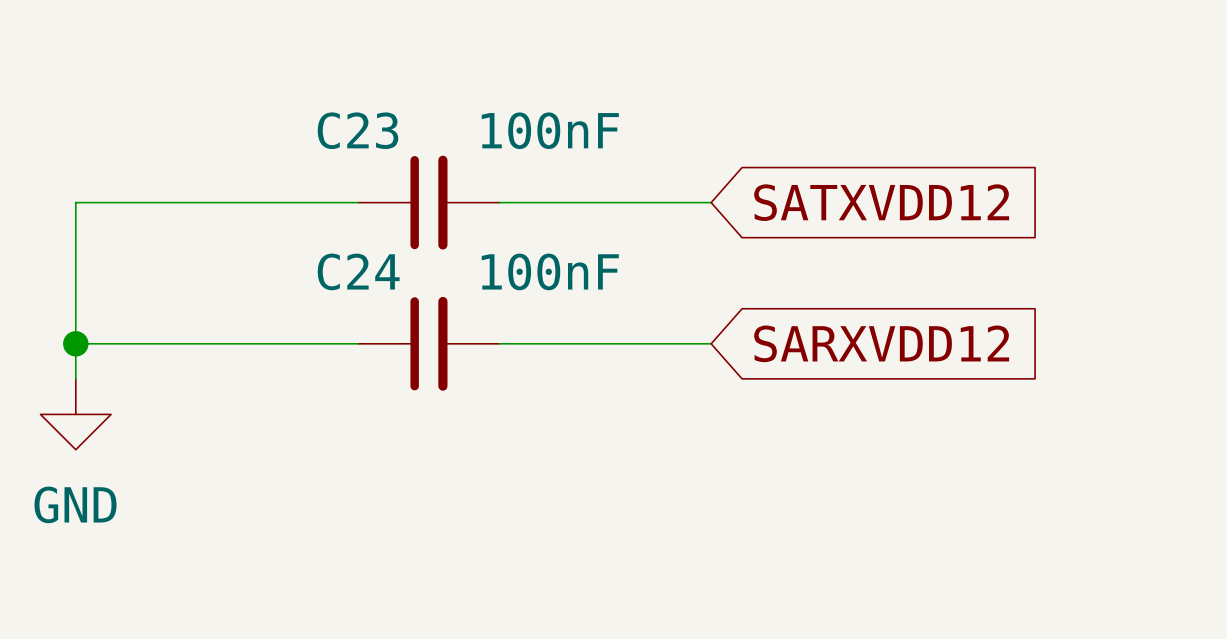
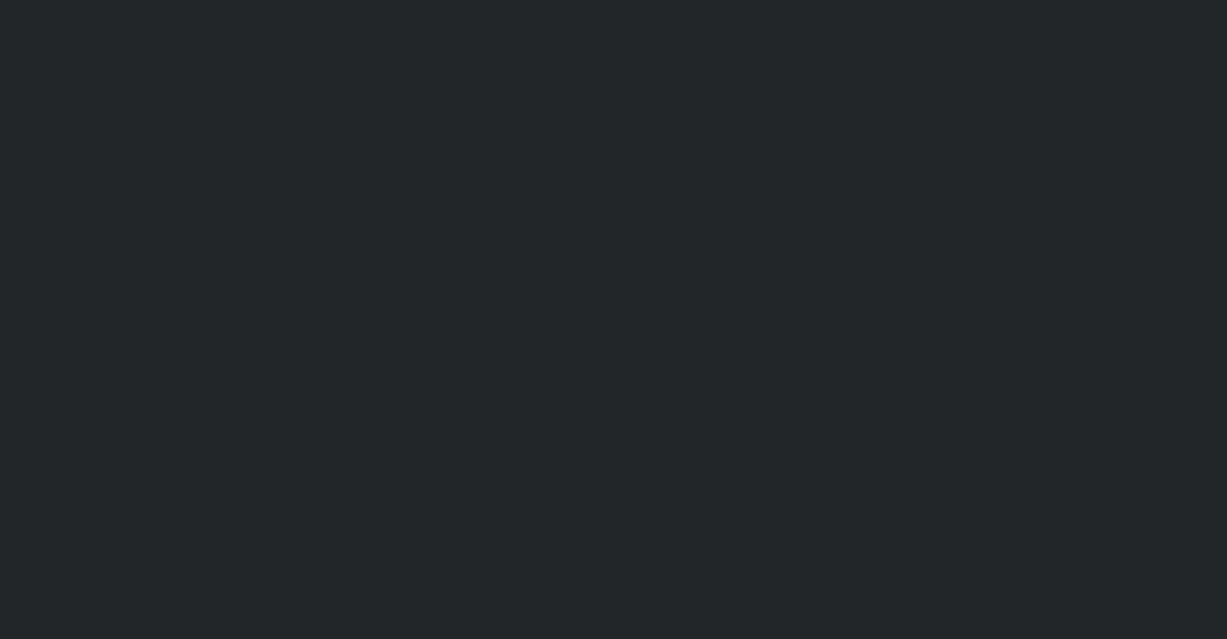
wire: (358, 202) (75, 202) (75, 379) -> none
C23: 100nF (428, 202) -> none
wire: (499, 202) (711, 202) -> none
global label: SATXVDD12 (881, 202) -> none
wire: (75, 343) (358, 343) -> none
junction: (75, 343) -> none
C24: 100nF (428, 343) -> none
wire: (499, 343) (711, 343) -> none
global label: SARXVDD12 (881, 343) -> none
power symbol: GND (75, 414) -> none

